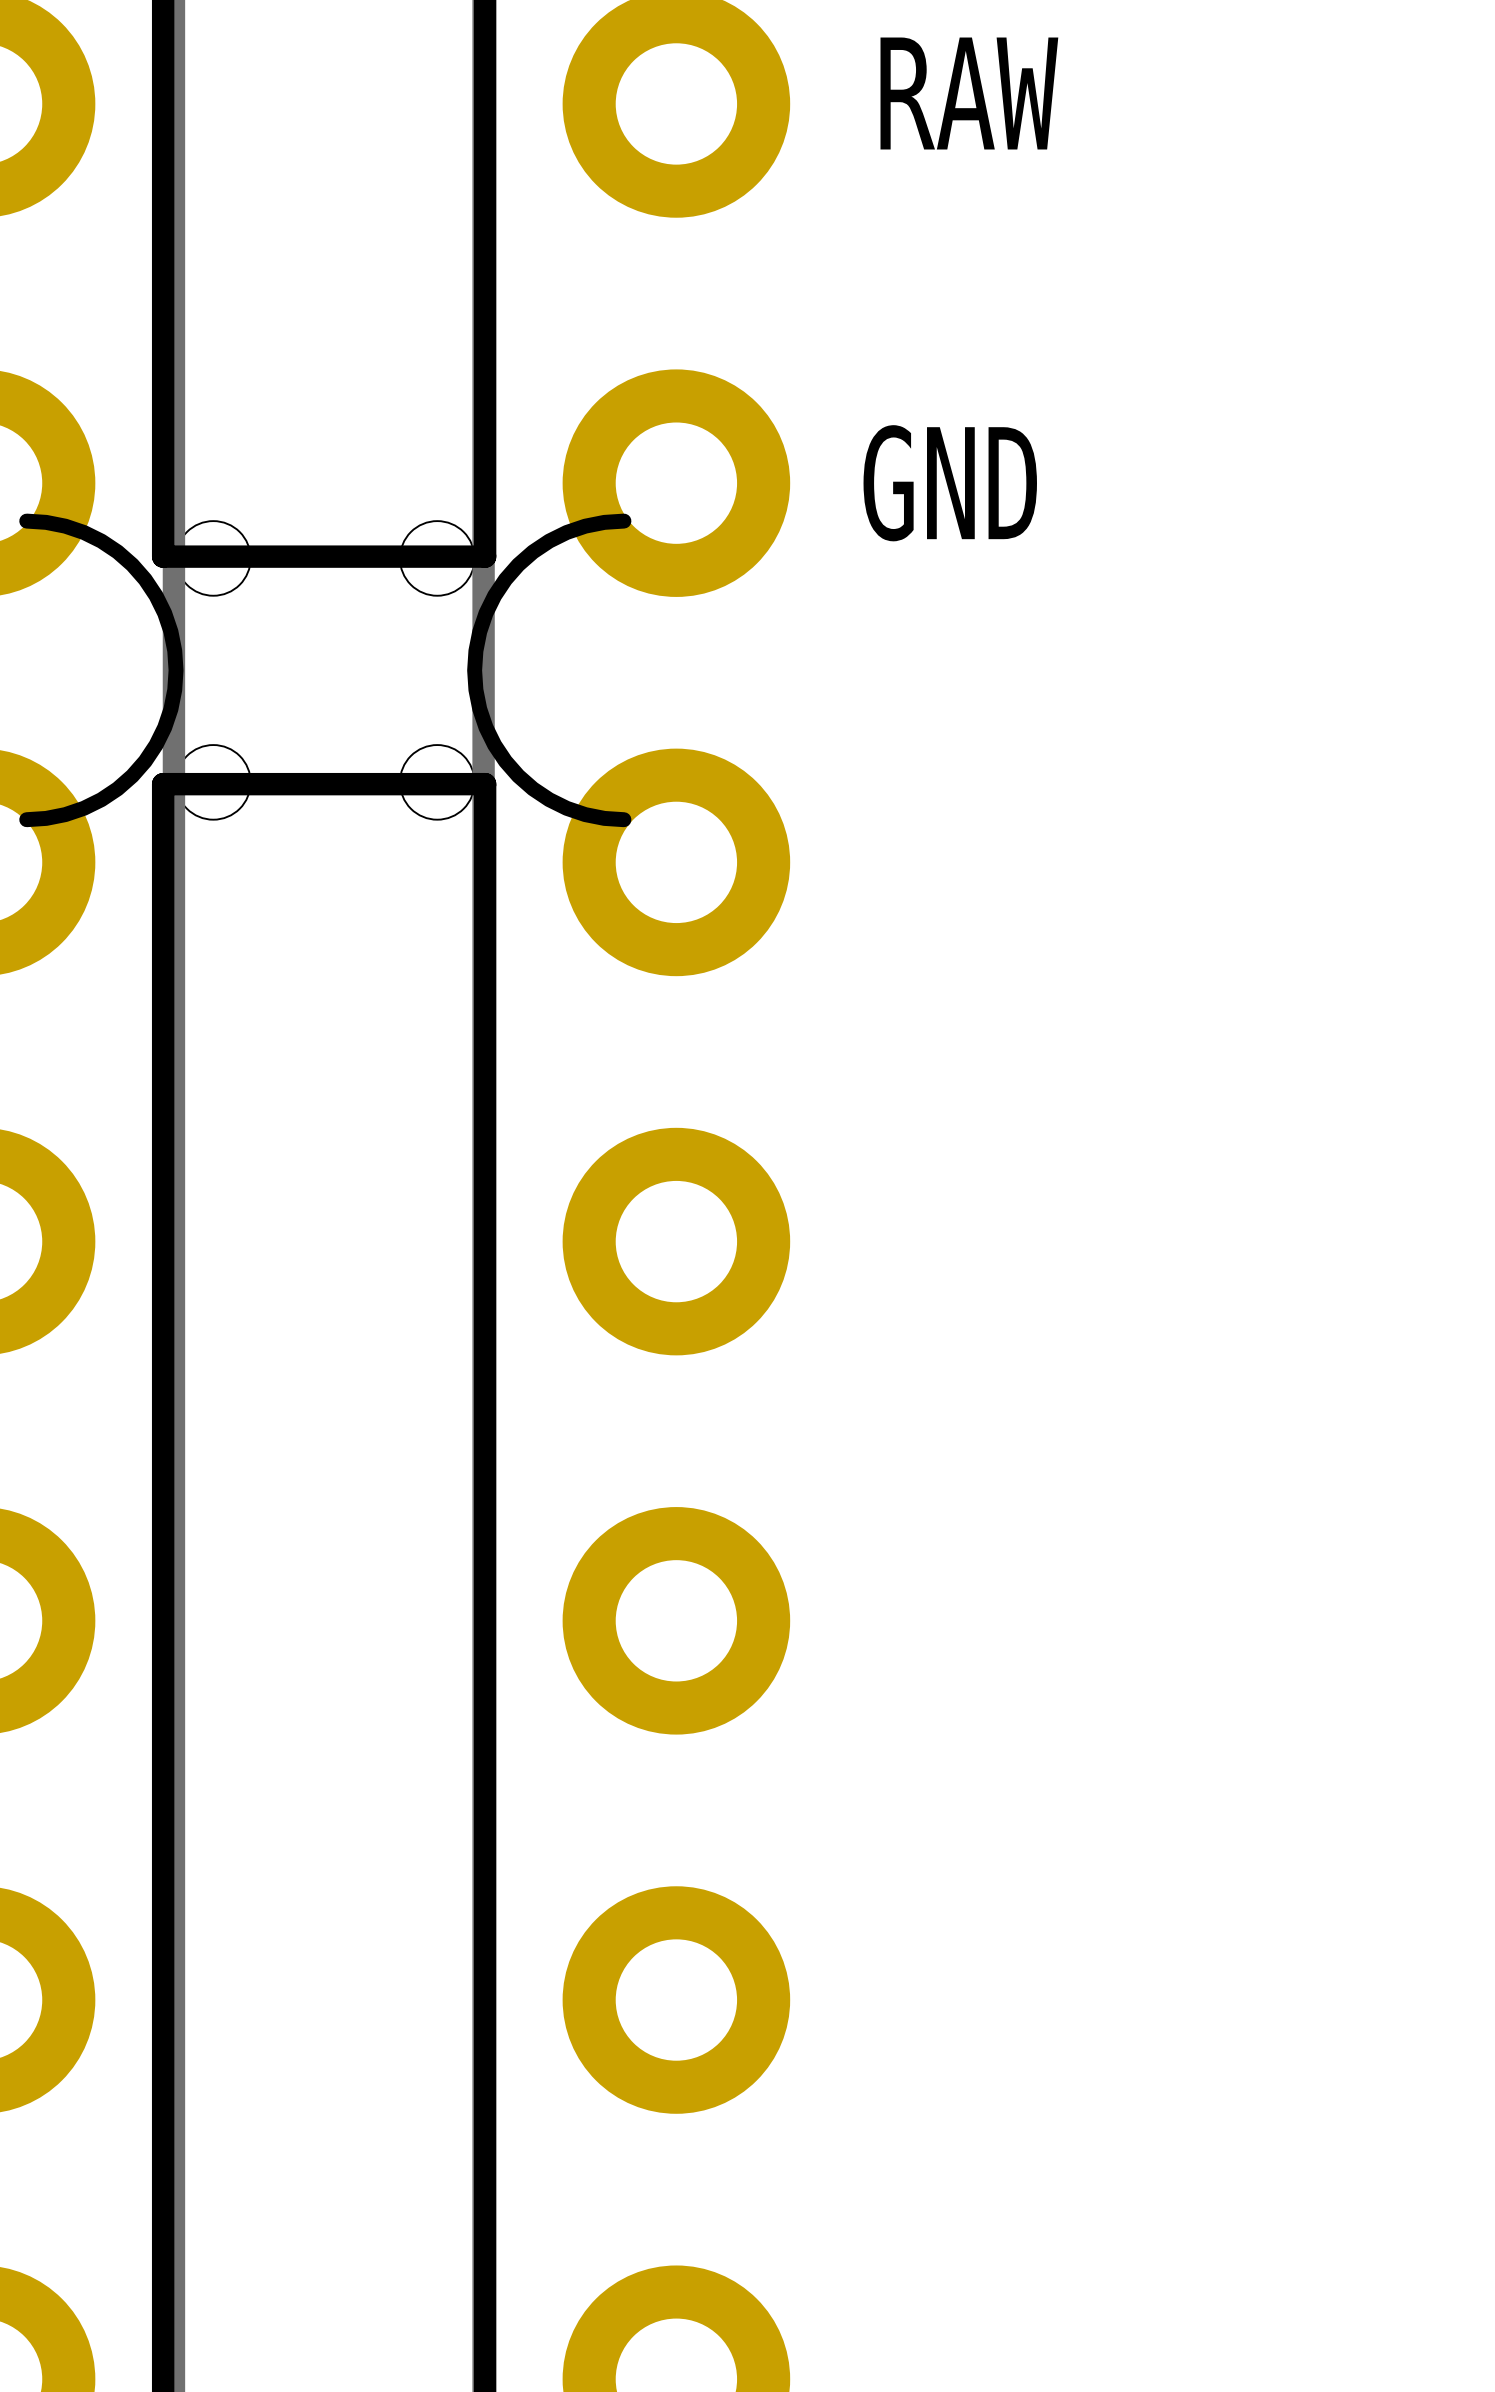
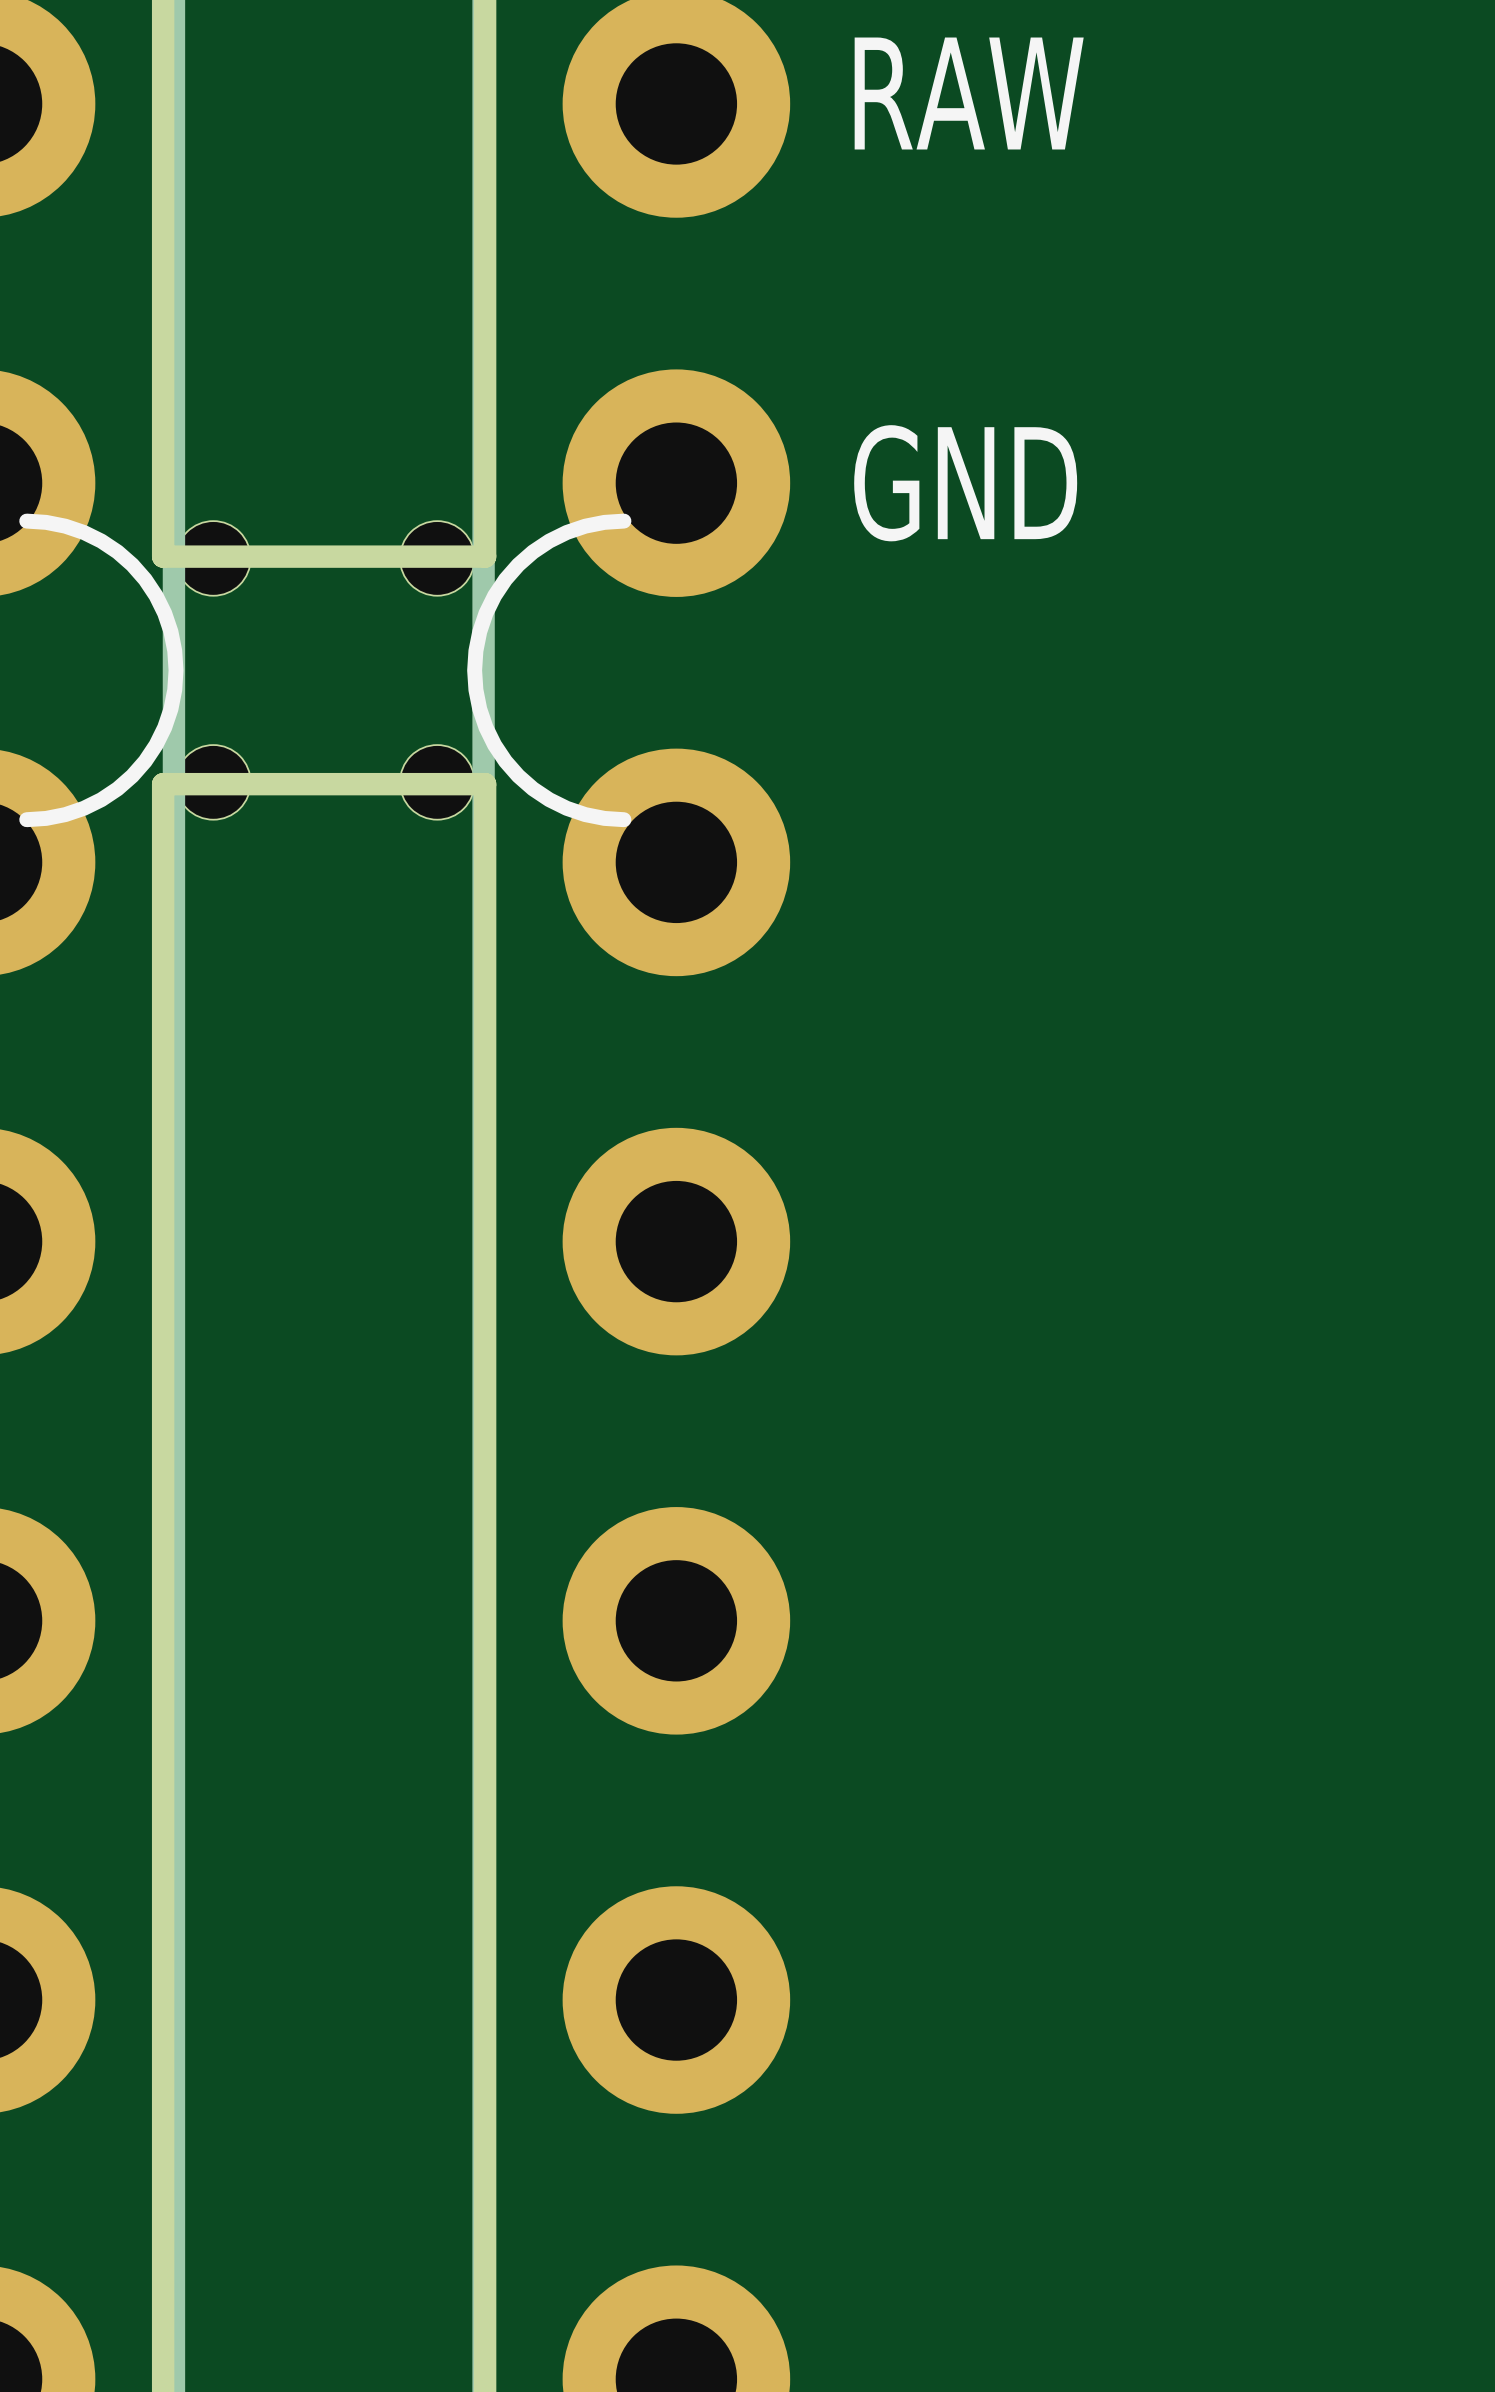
part text position: GND (950, 483) -> GND (965, 483)

